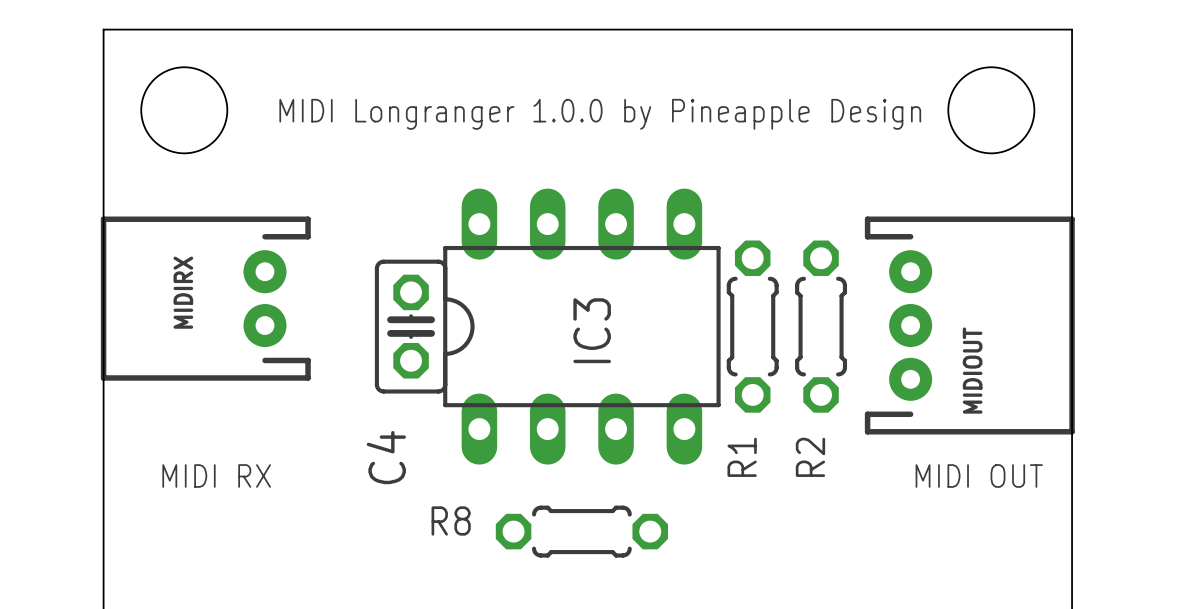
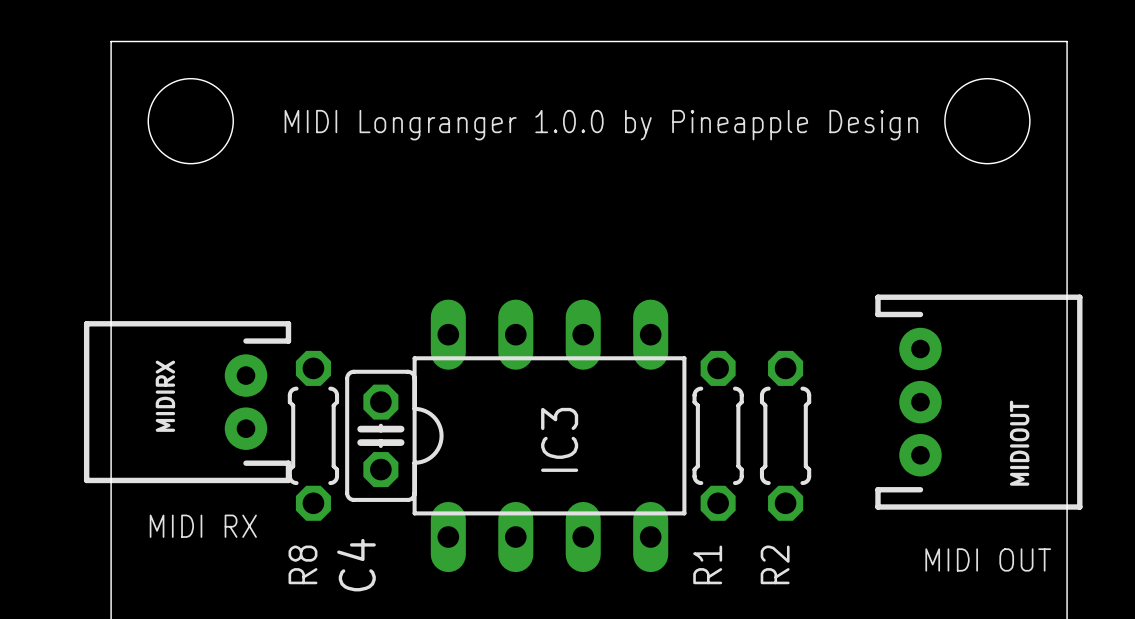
MIDIRX position: (205, 298) -> (187, 402)
MIDIOUT position: (969, 325) -> (978, 402)
C4 position: (411, 326) -> (380, 435)
IC3 position: (581, 326) -> (549, 435)
R1 position: (752, 326) -> (718, 435)
R2 position: (821, 326) -> (785, 435)
MIDIOUT name position: MIDIOUT (972, 370) -> MIDIOUT (1019, 443)
text position: MIDI RX (216, 475) -> MIDI RX (203, 526)
text position: MIDI OUT (979, 475) -> MIDI OUT (988, 559)
R8 name position: R8 (451, 520) -> R8 (302, 564)
R8 rotation: 0° (581, 531) -> 90° clockwise (313, 435)
R8 position: (581, 531) -> (313, 435)

